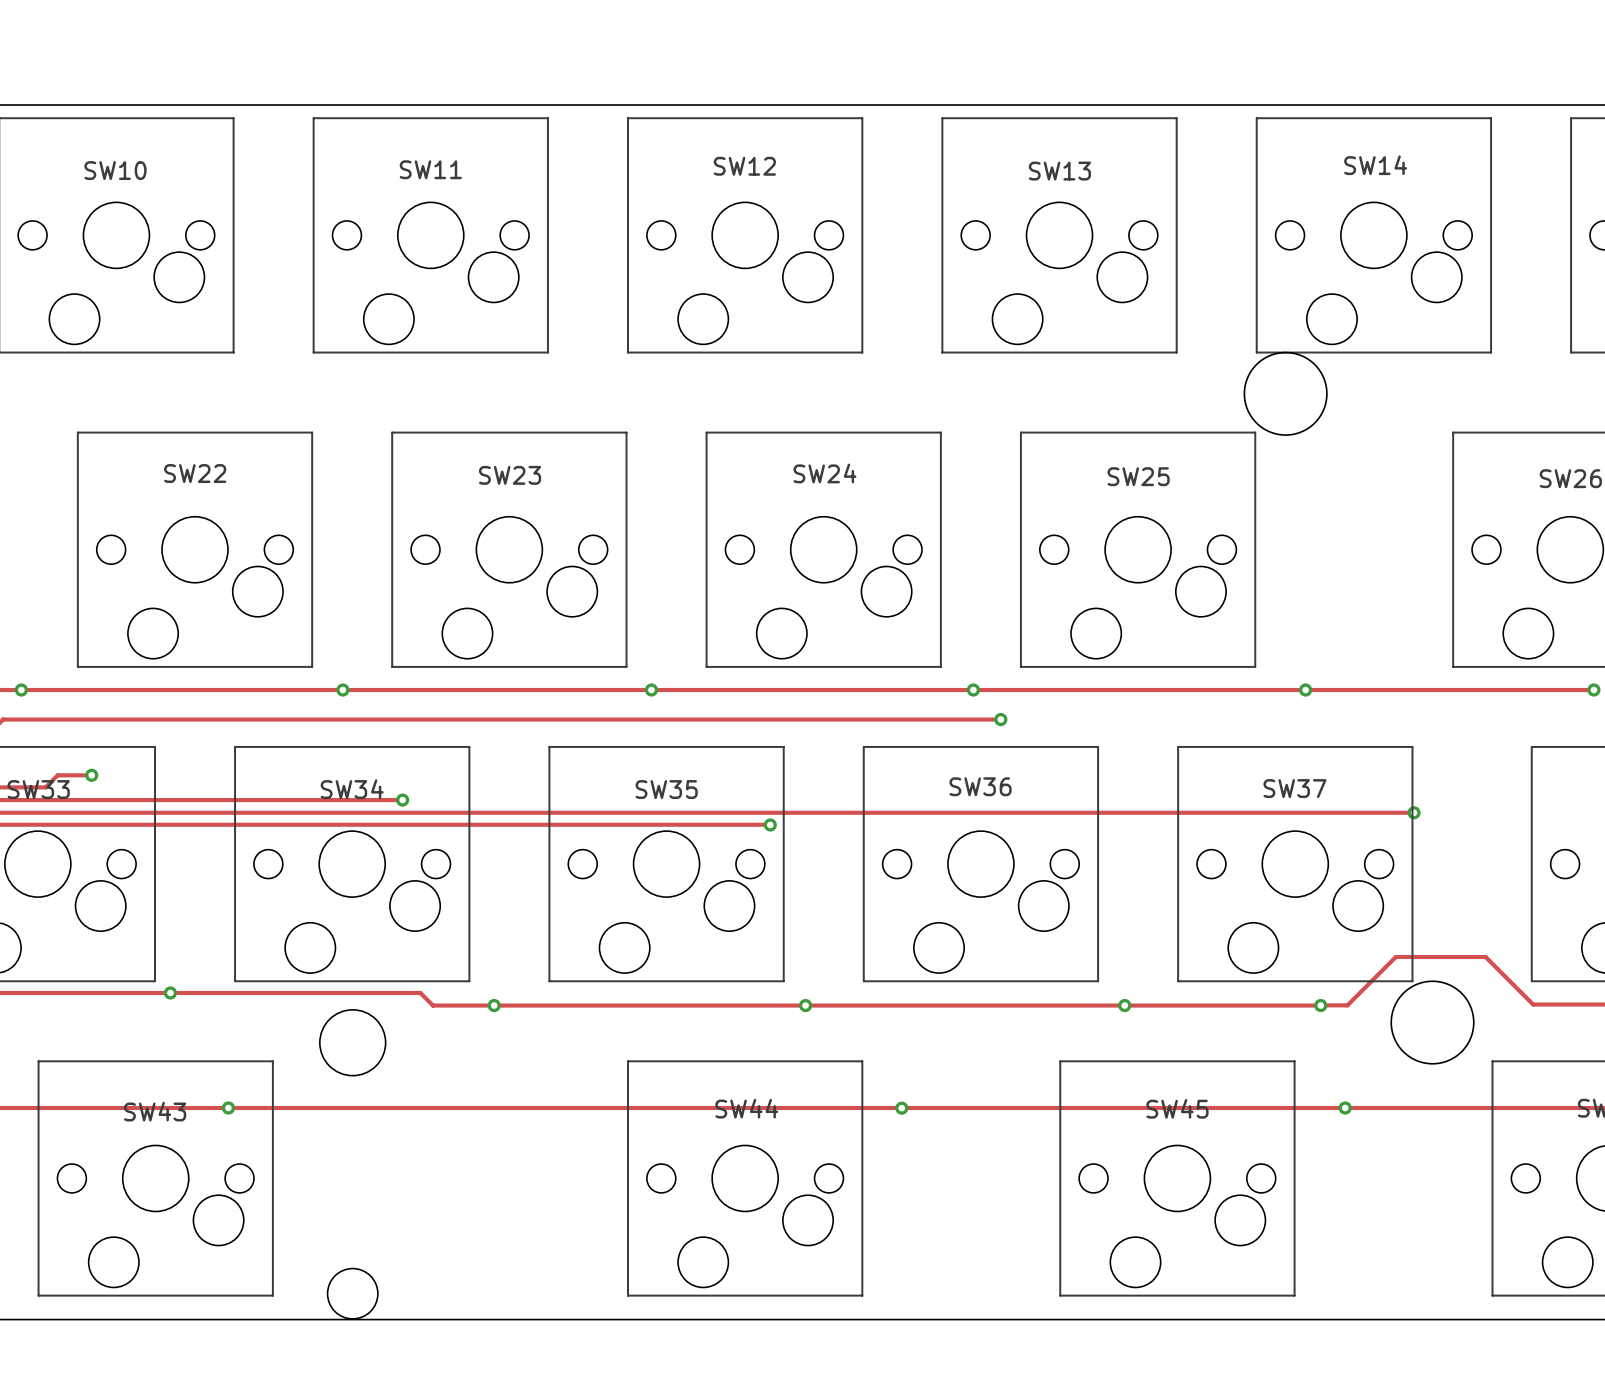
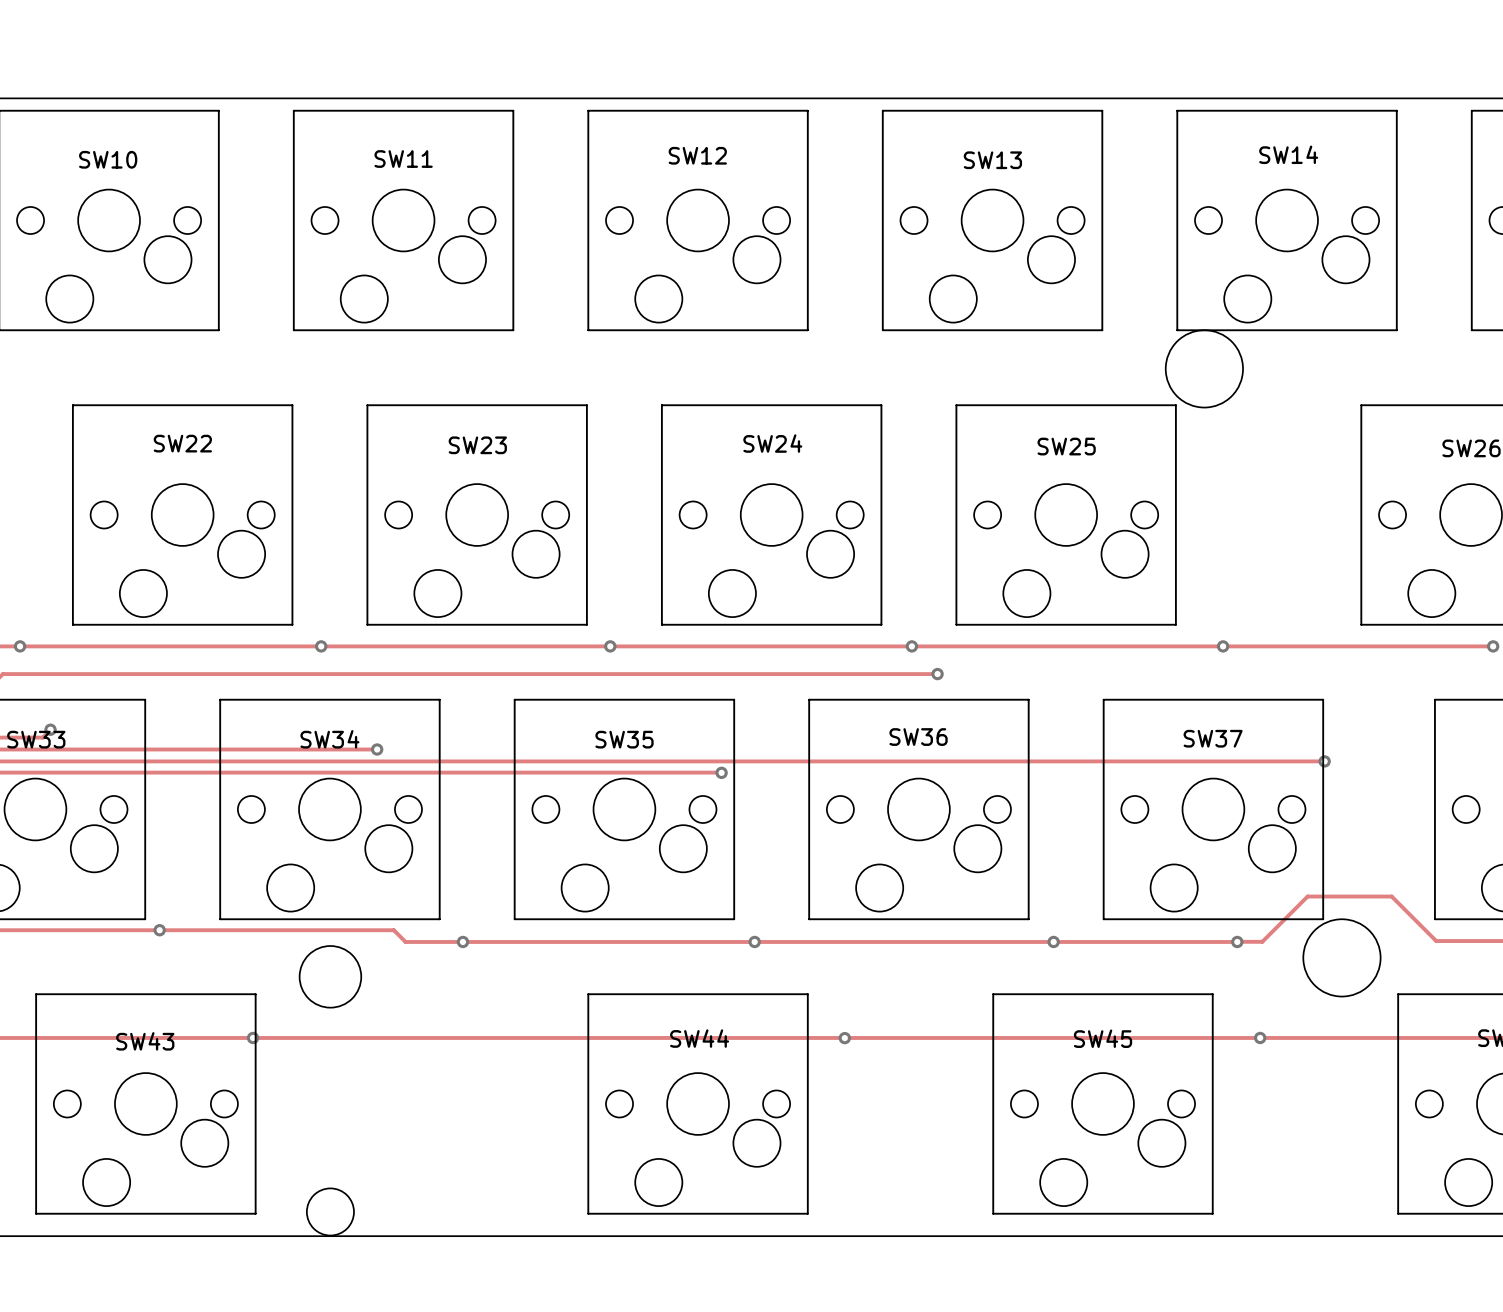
track: (91, 775) (57, 775) (53, 779) -> none
via position: (91, 775) -> (50, 729)
via position: (228, 1108) -> (253, 1037)

